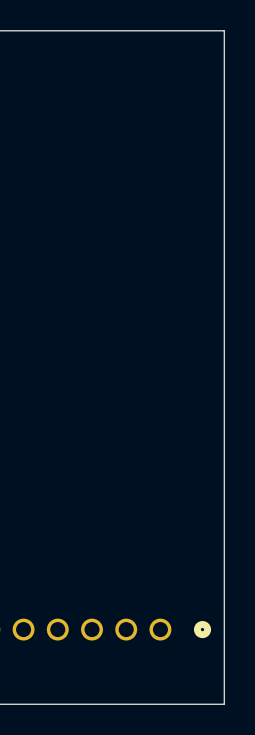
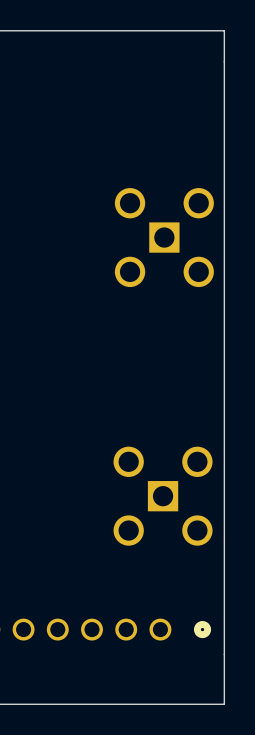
part: none -> (164, 237)
part: none -> (163, 496)

